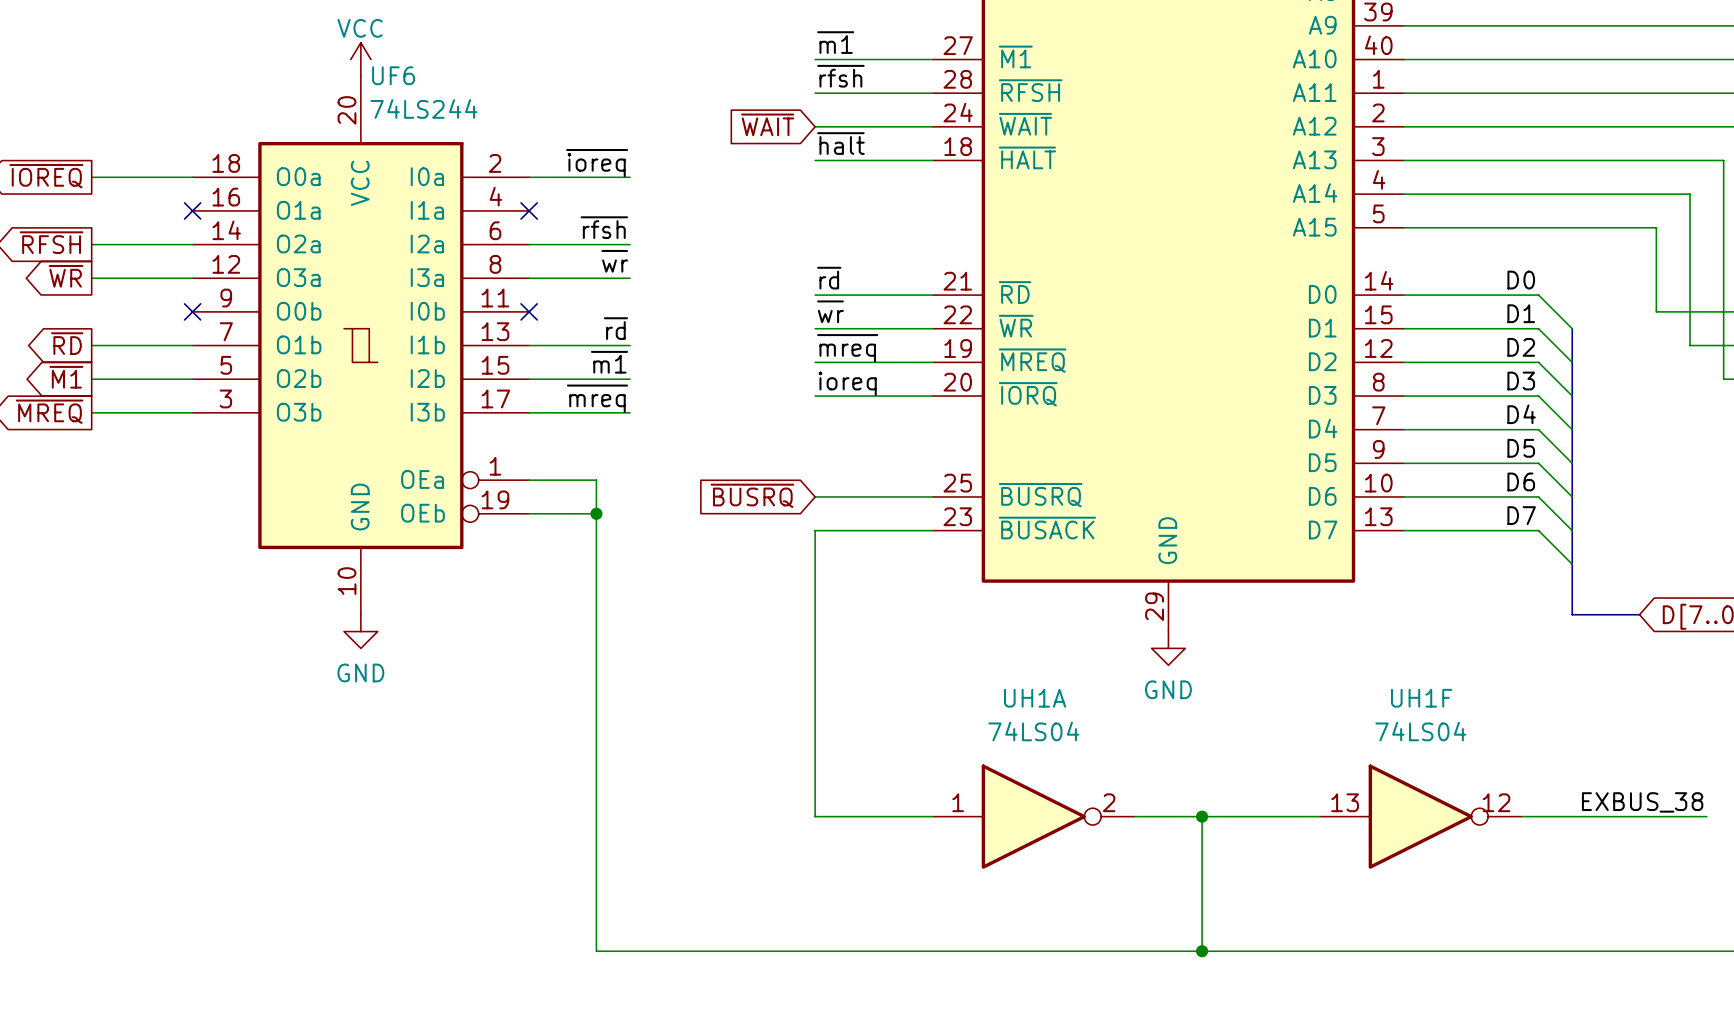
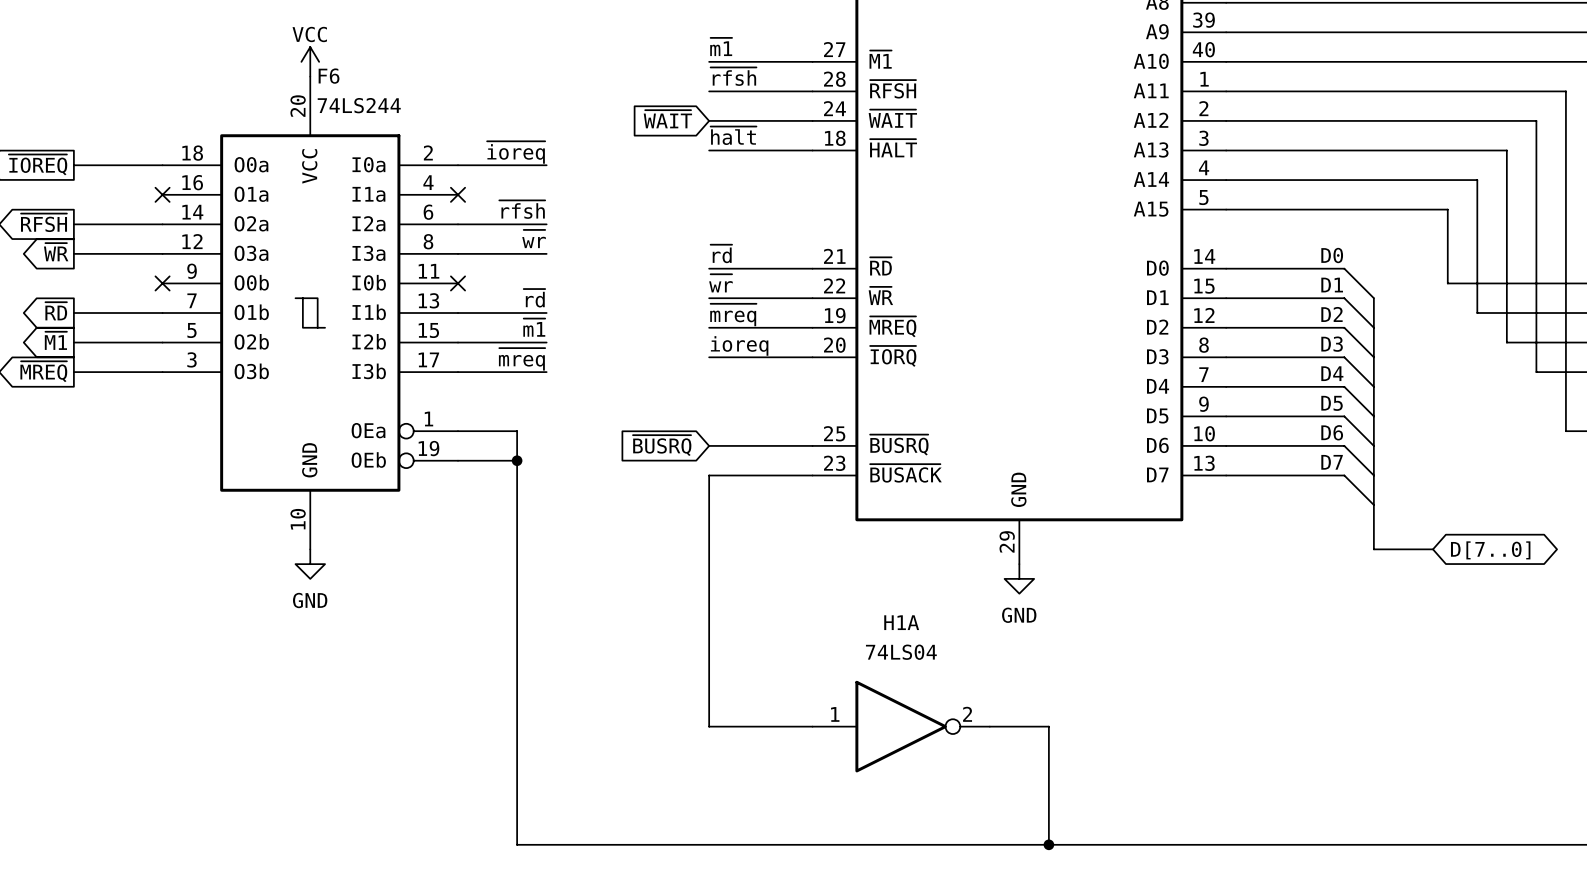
UF6 name: UF6 (393, 75) -> F6 (329, 76)
UH1A name: UH1A (1035, 698) -> H1A (901, 622)
label: EXBUS_38 (1642, 802) -> none
wire: (1202, 816) (1319, 816) -> none
junction: (1202, 816) -> none
UH1F: 74LS04 (1420, 816) -> none
wire: (1521, 816) (1706, 816) -> none

